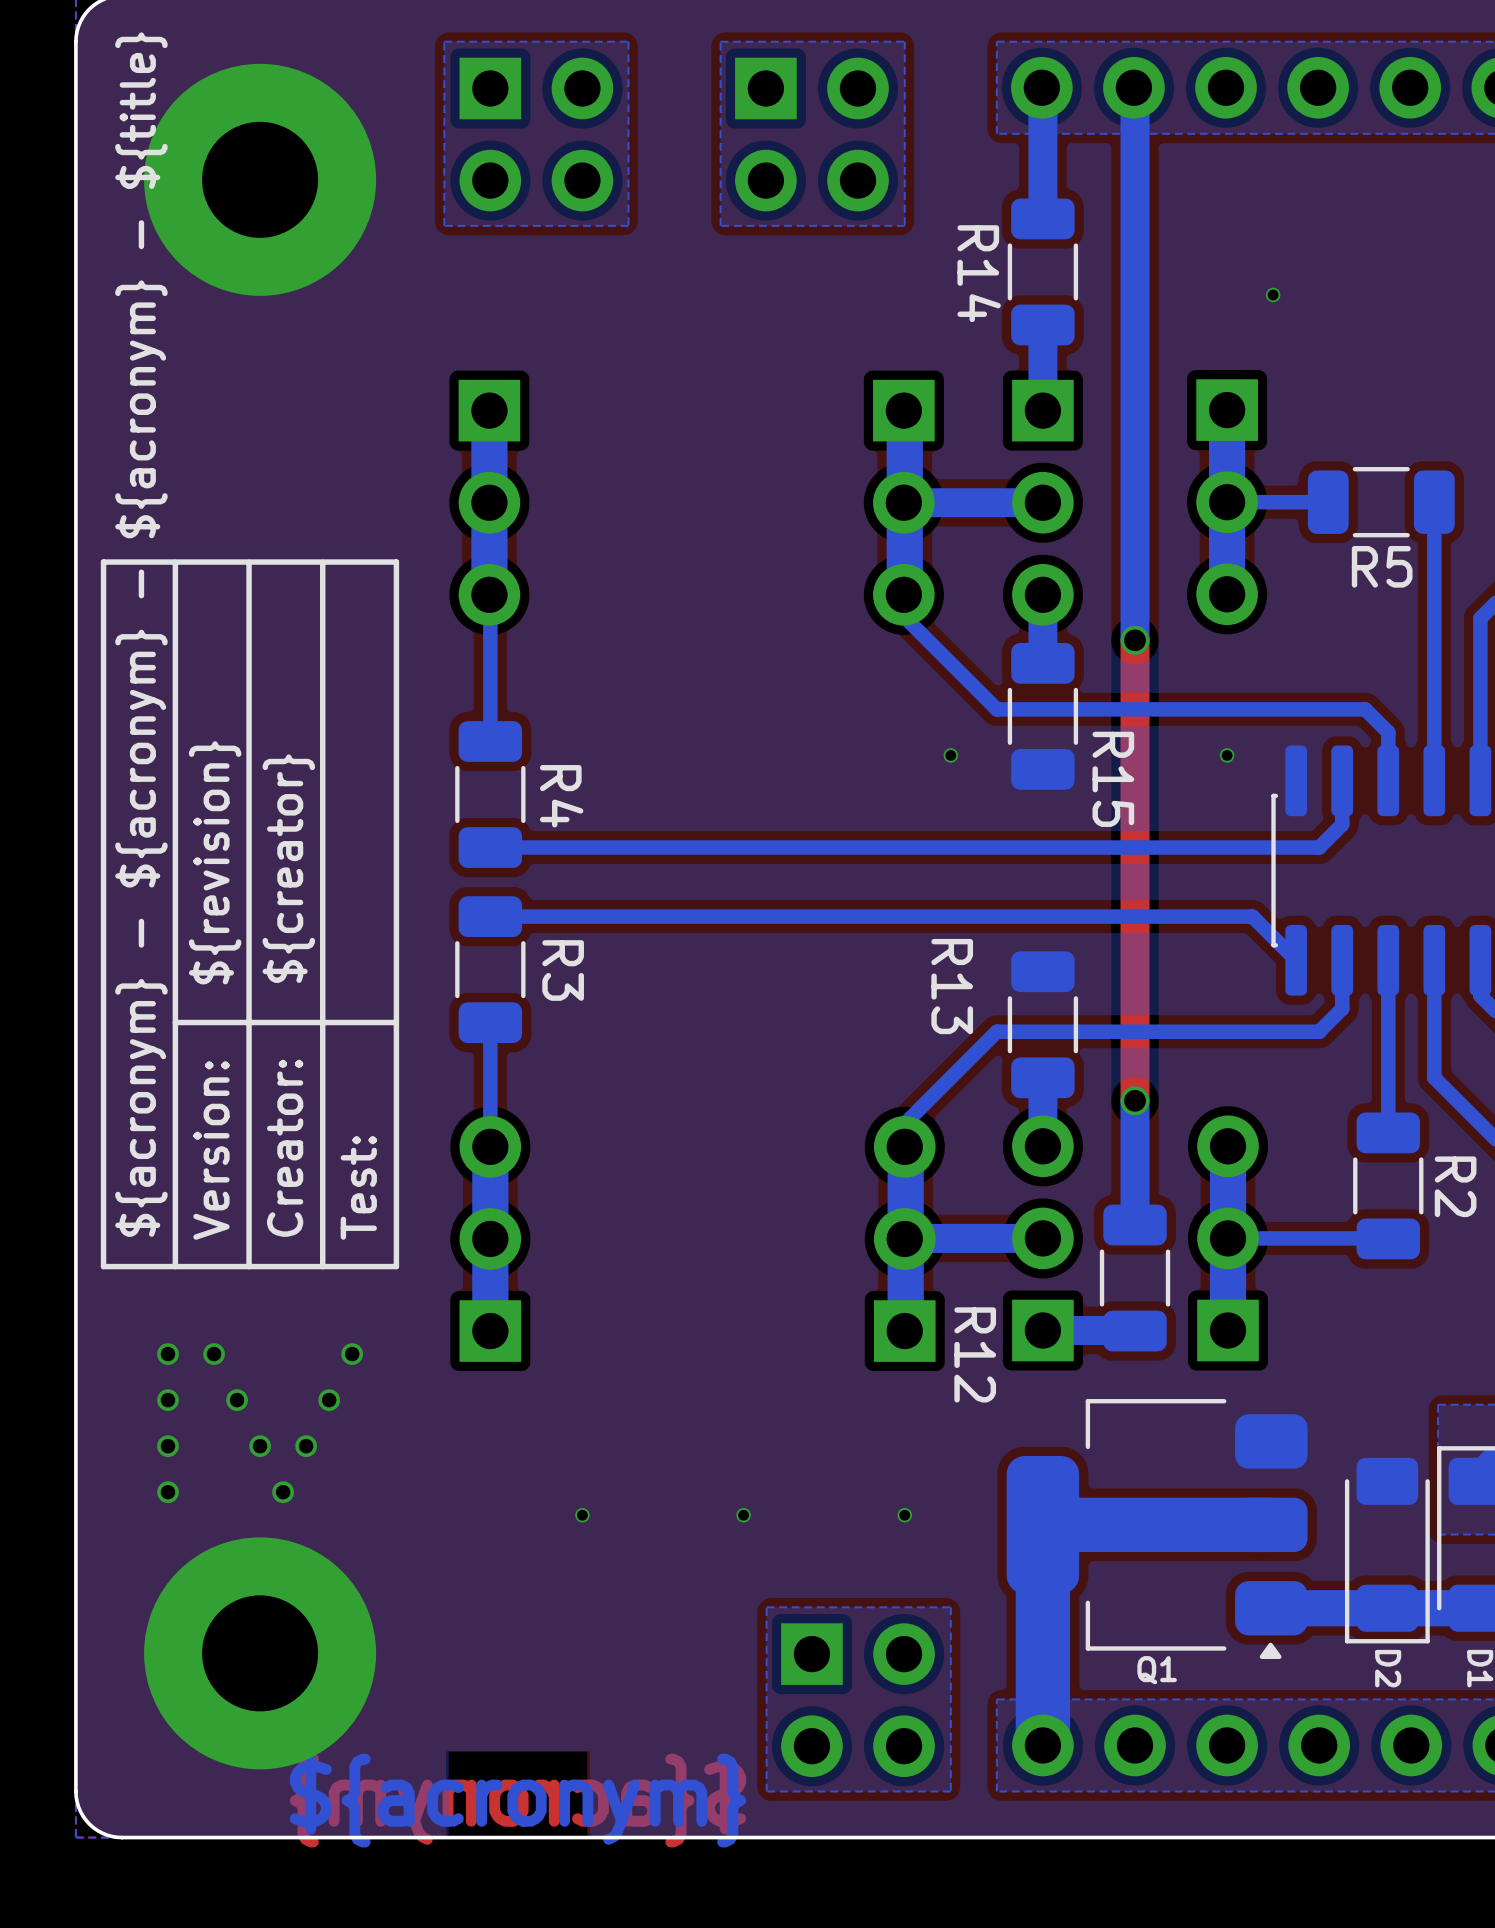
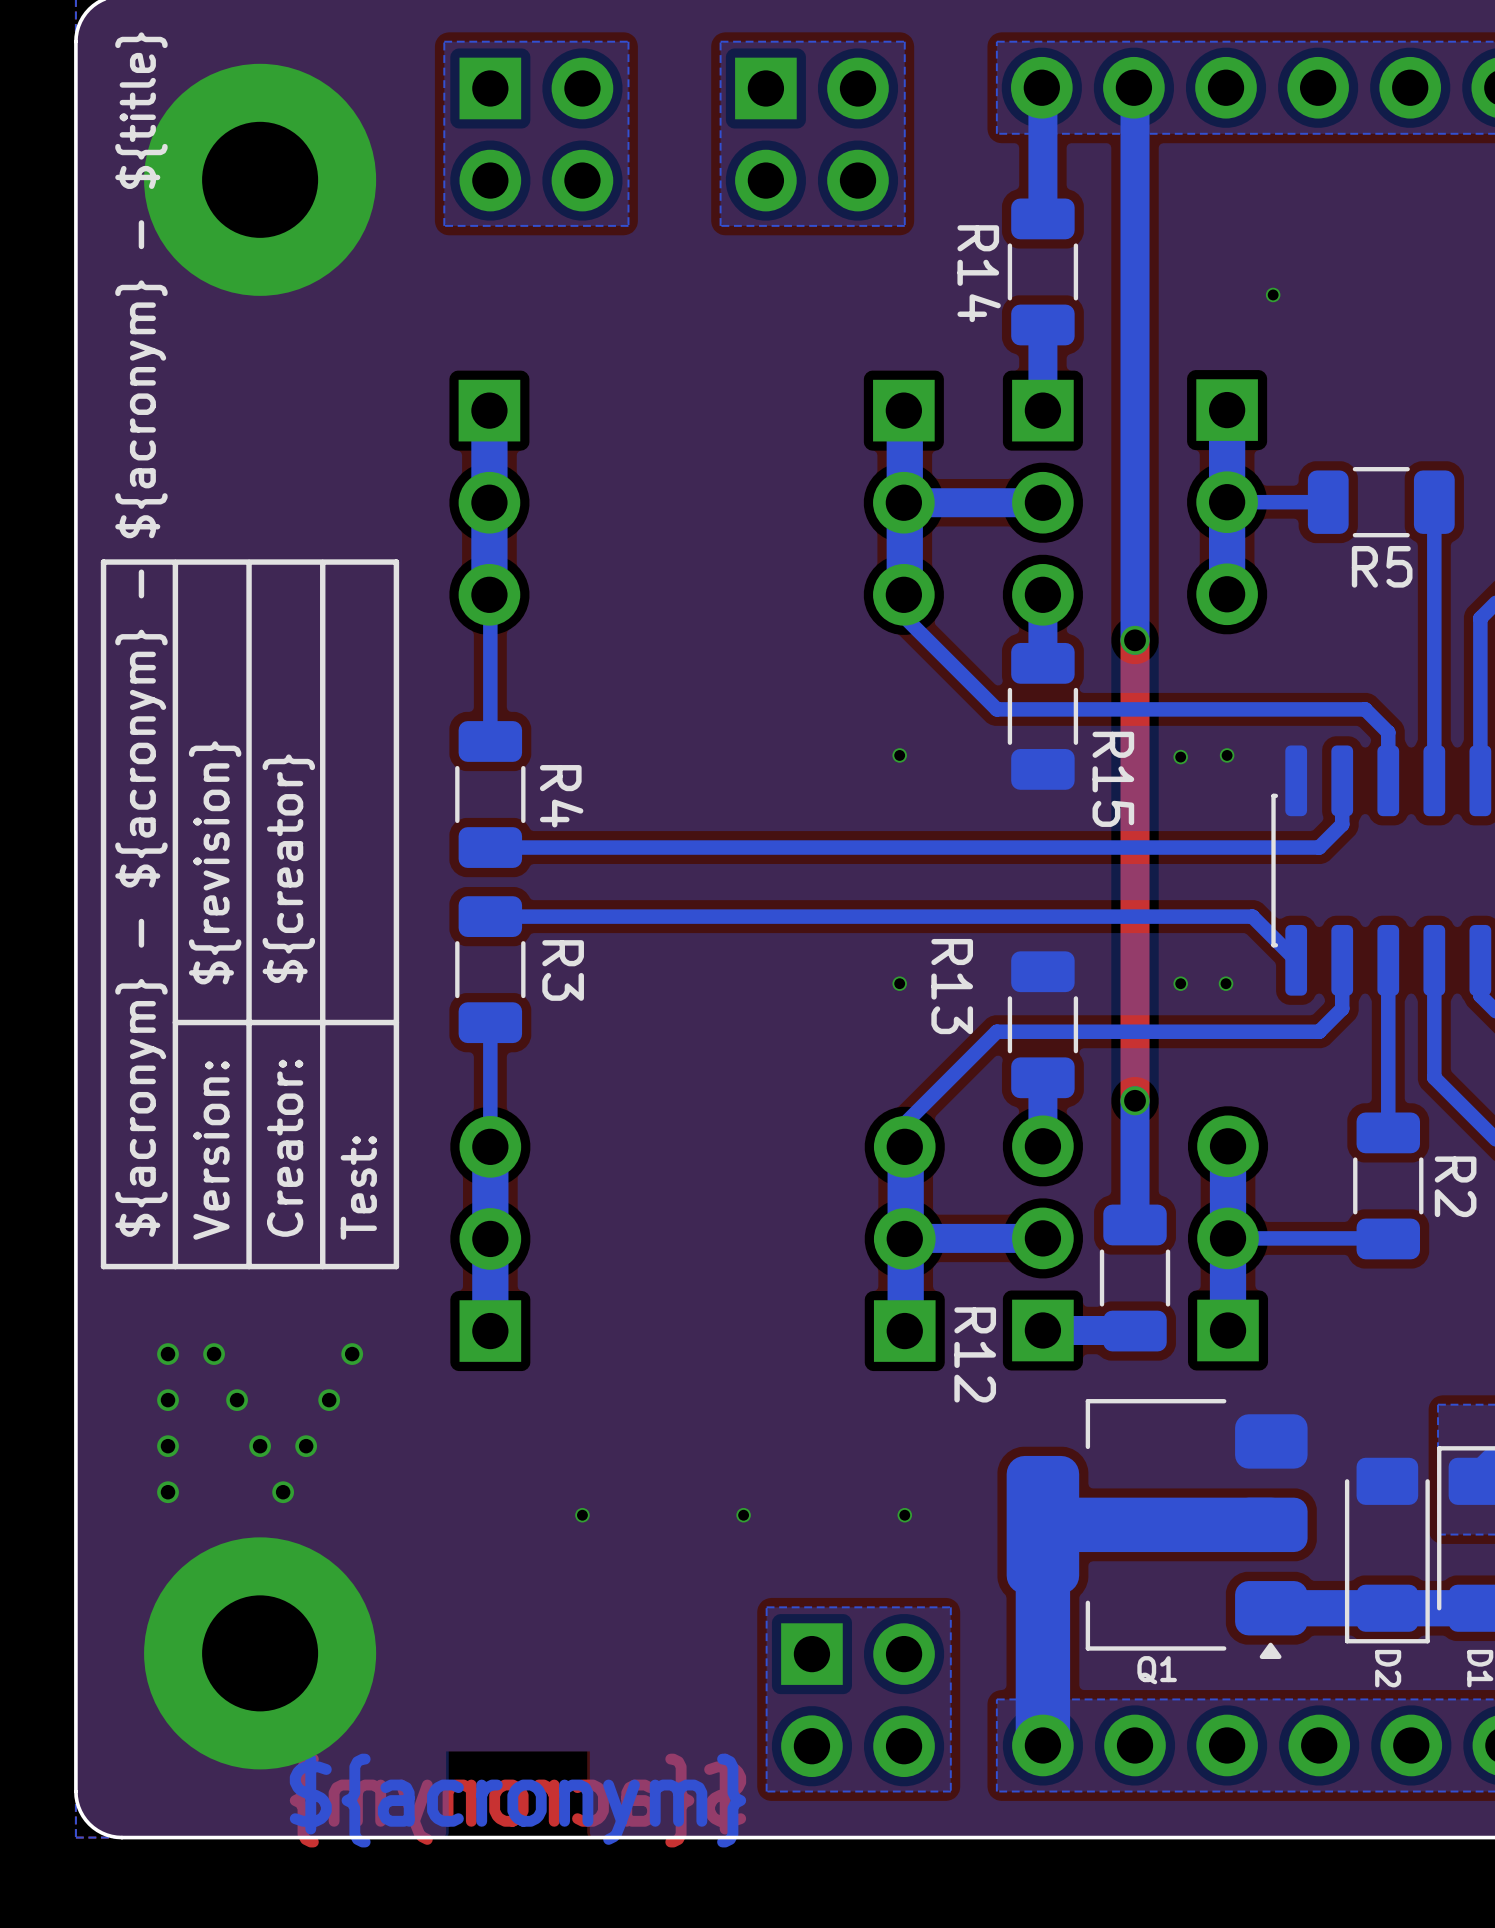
via position: (950, 755) -> (899, 755)
via: none -> (1180, 757)
via: none -> (899, 983)
via: none -> (1180, 983)
via: none -> (1226, 983)

